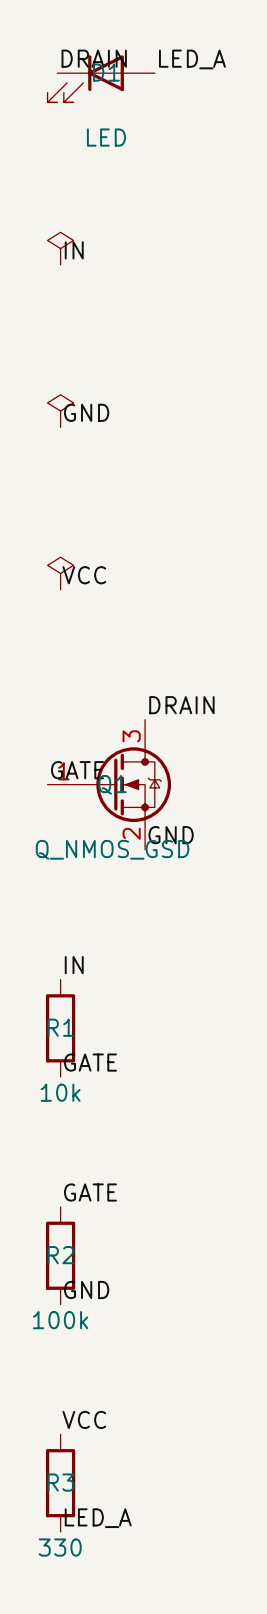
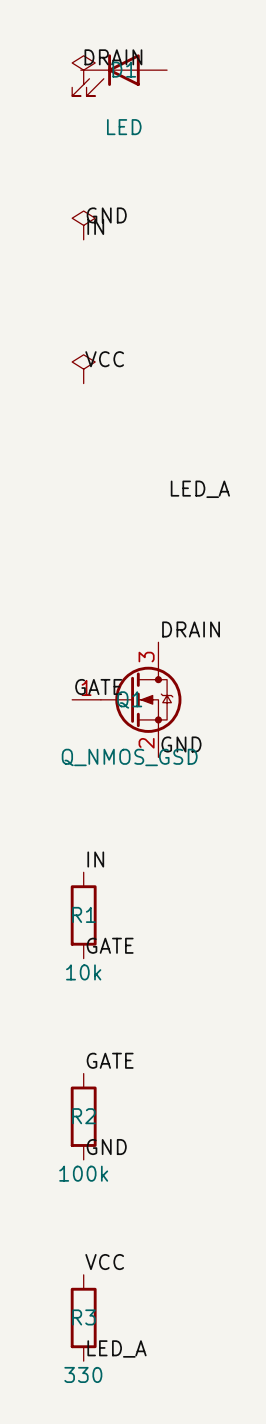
label: LED_A (192, 59) -> none
power symbol: none -> (83, 70)
label position: GND (86, 412) -> GND (106, 215)
label: none -> LED_A (200, 489)
power symbol: (60, 573) -> none
label position: VCC (84, 575) -> VCC (104, 359)

